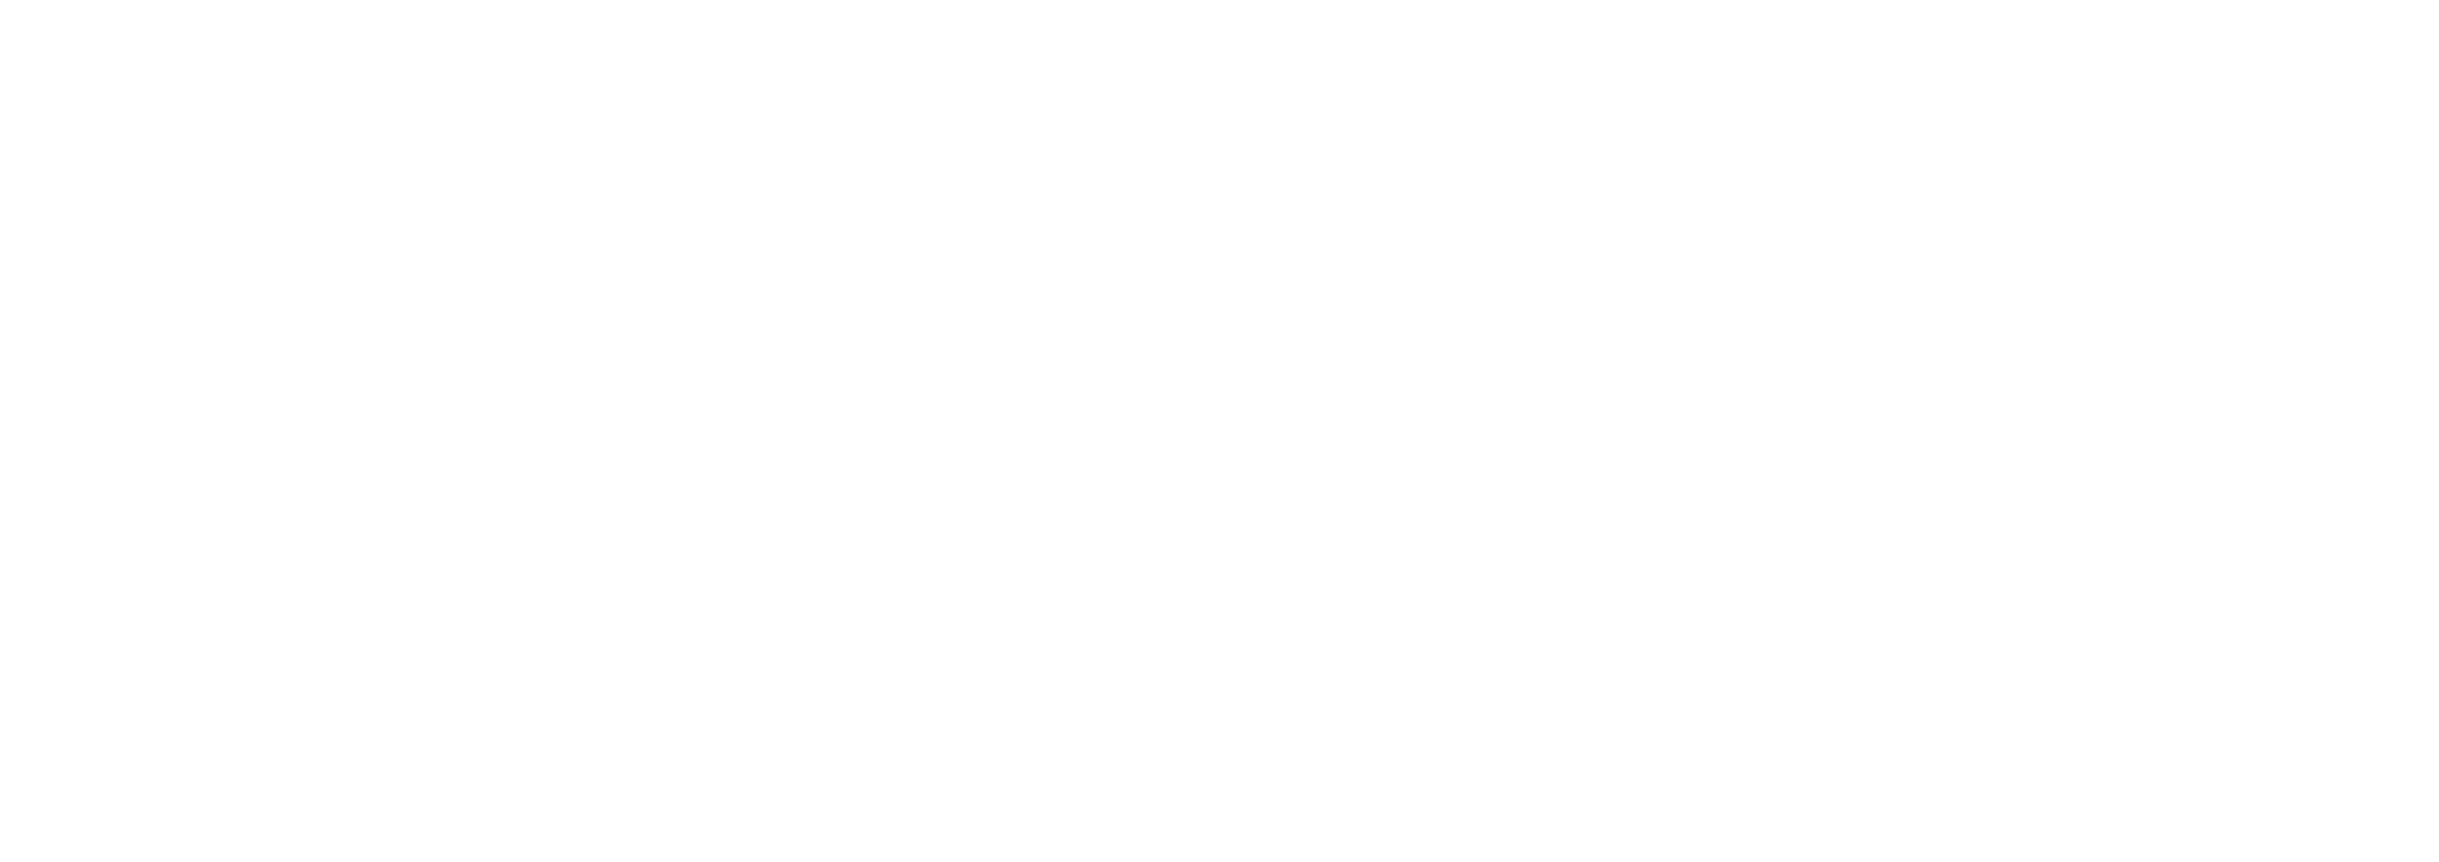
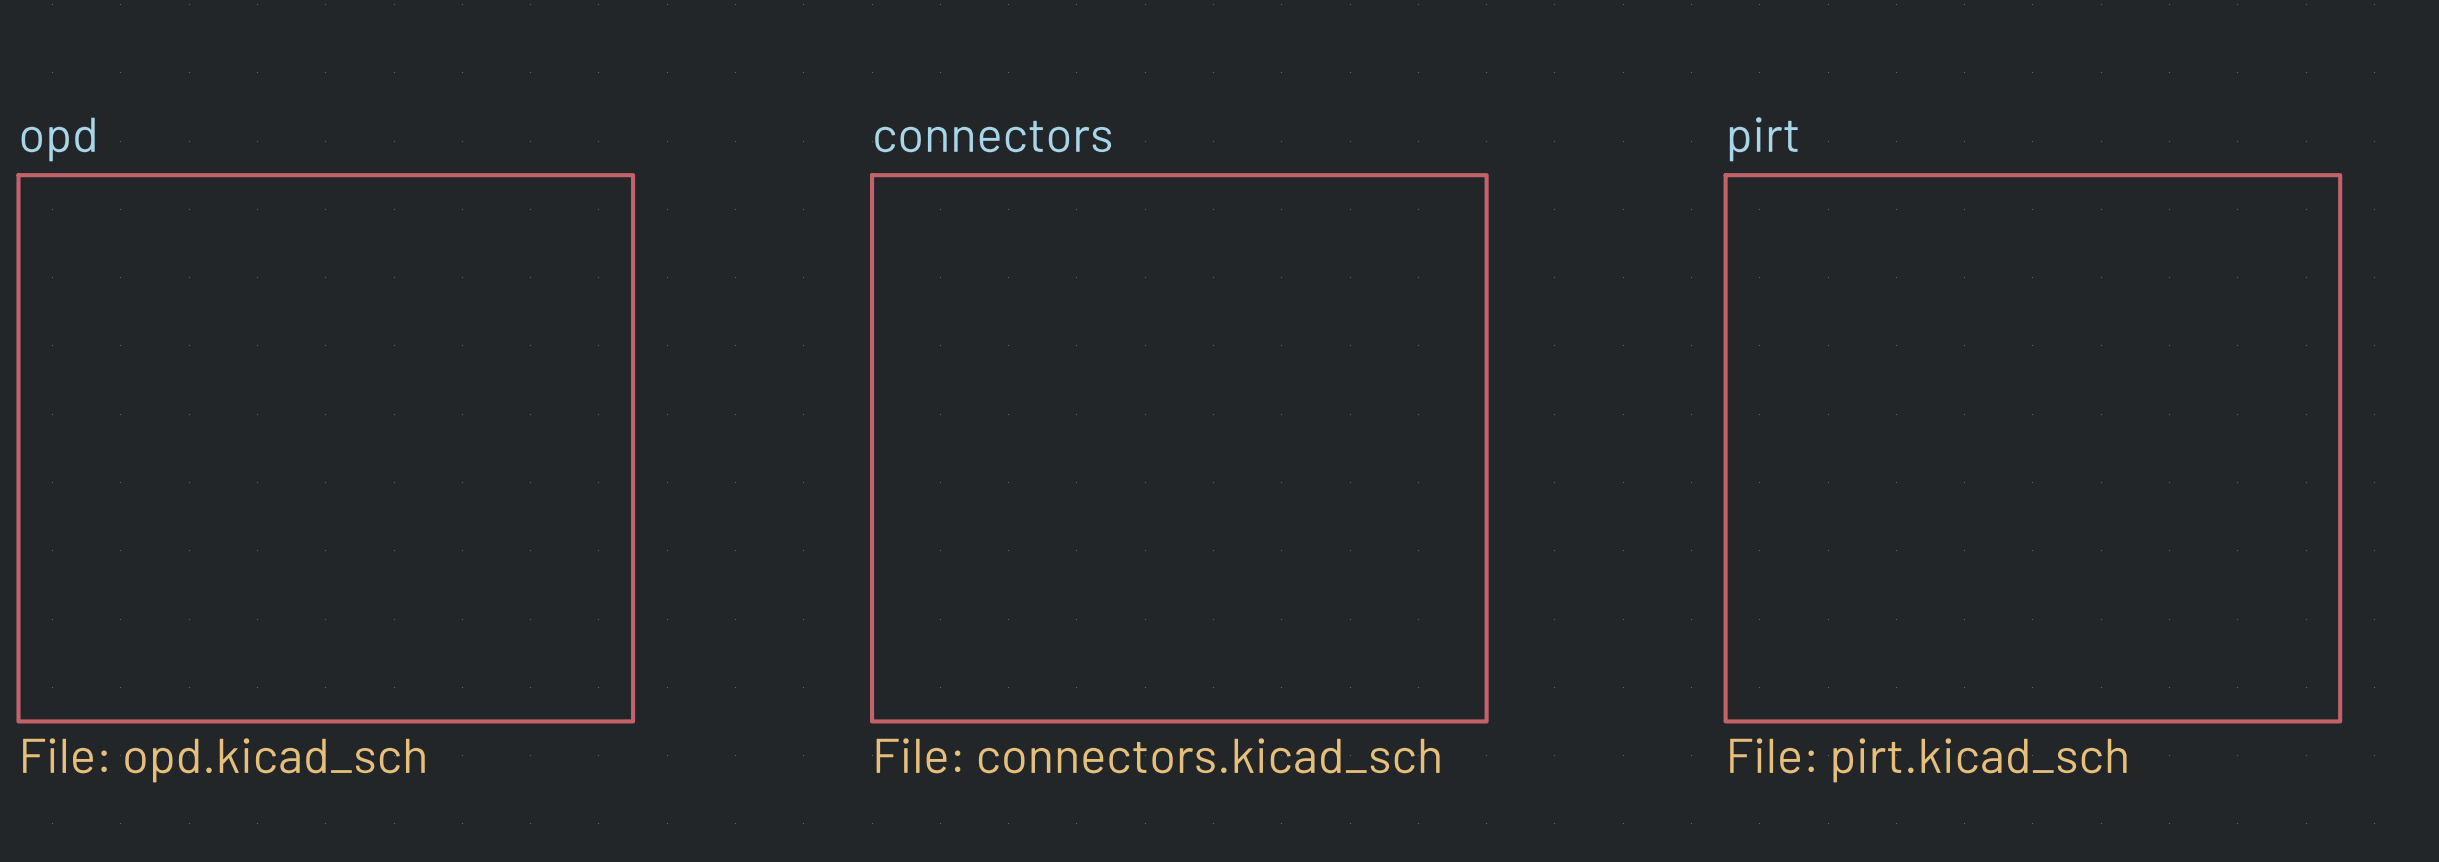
sheet opd: none -> File: opd.kicad_sch (325, 448)
sheet connectors: none -> File: connectors.kicad_sch (1179, 448)
sheet pirt: none -> File: pirt.kicad_sch (2032, 448)

